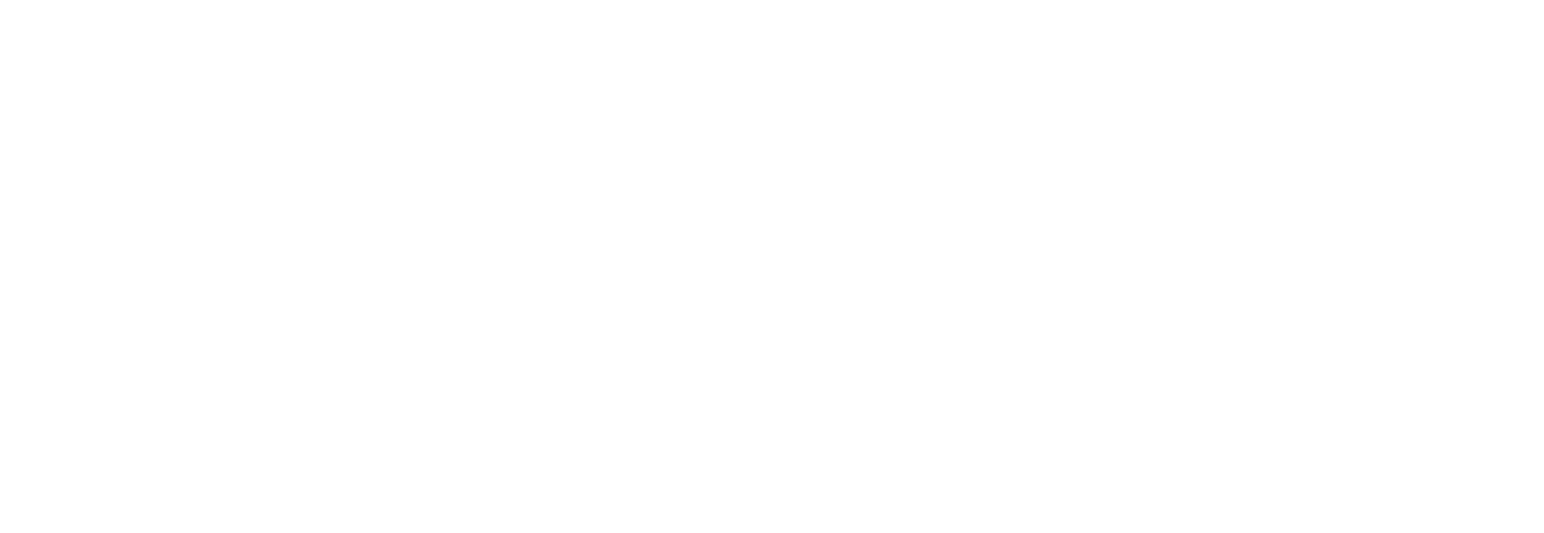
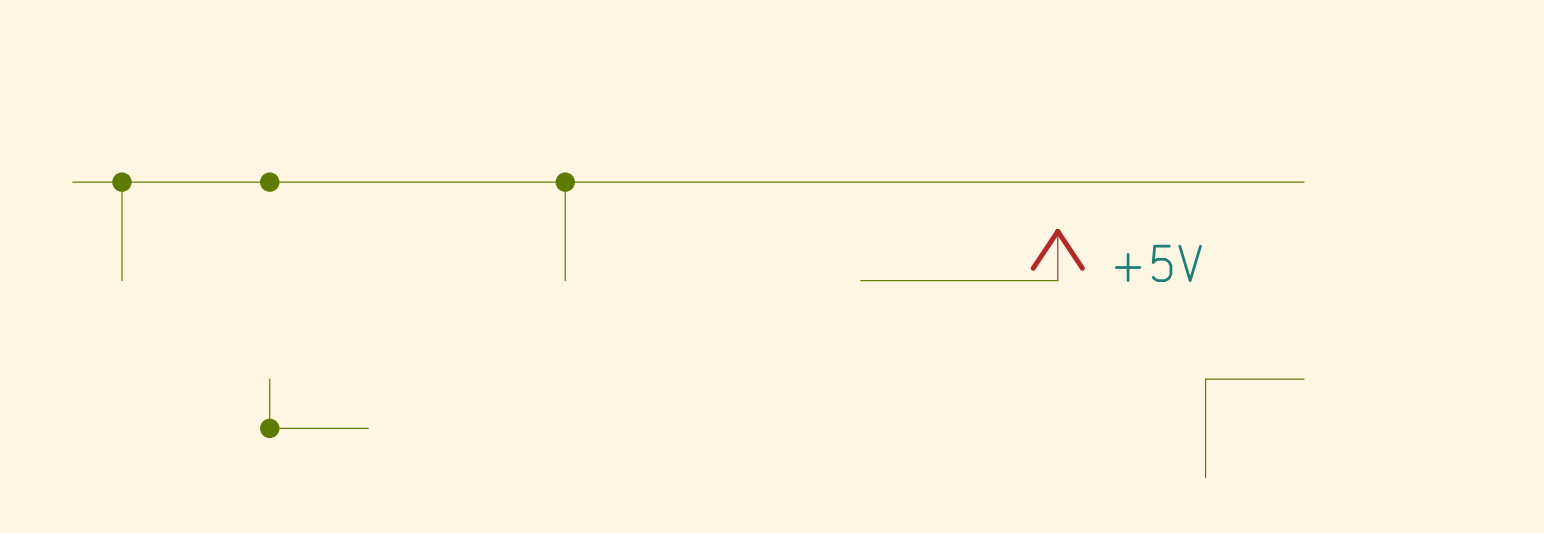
wire: none -> (72, 182) (1304, 182)
wire: none -> (121, 182) (121, 280)
junction: none -> (121, 182)
junction: none -> (269, 182)
wire: none -> (565, 182) (565, 280)
junction: none -> (565, 182)
power symbol: none -> +5V (1057, 254)
wire: none -> (860, 280) (1057, 280)
wire: none -> (269, 379) (269, 428) (368, 428)
wire: none -> (1304, 379) (1205, 379) (1205, 477)
junction: none -> (269, 428)

